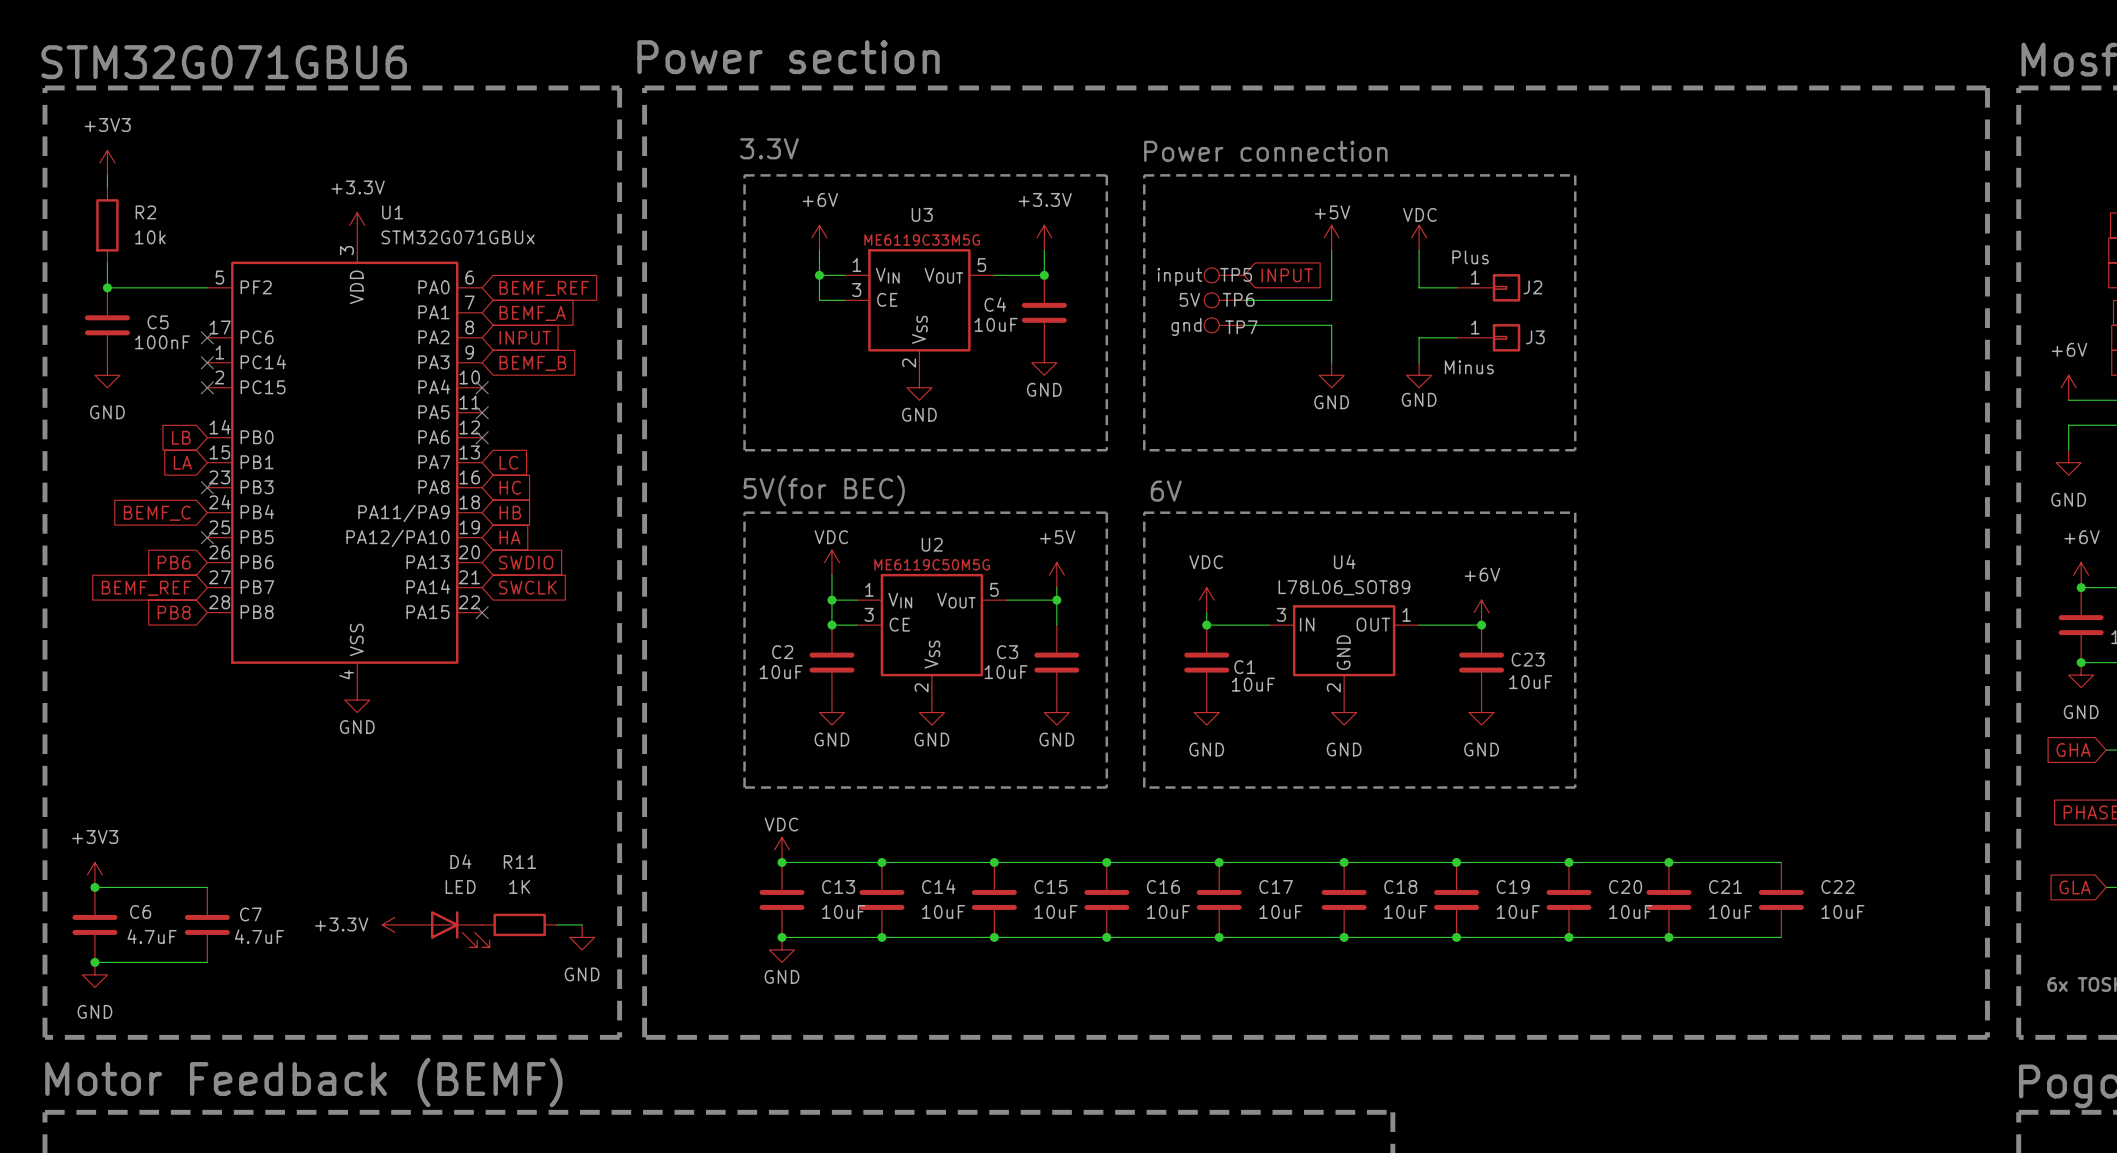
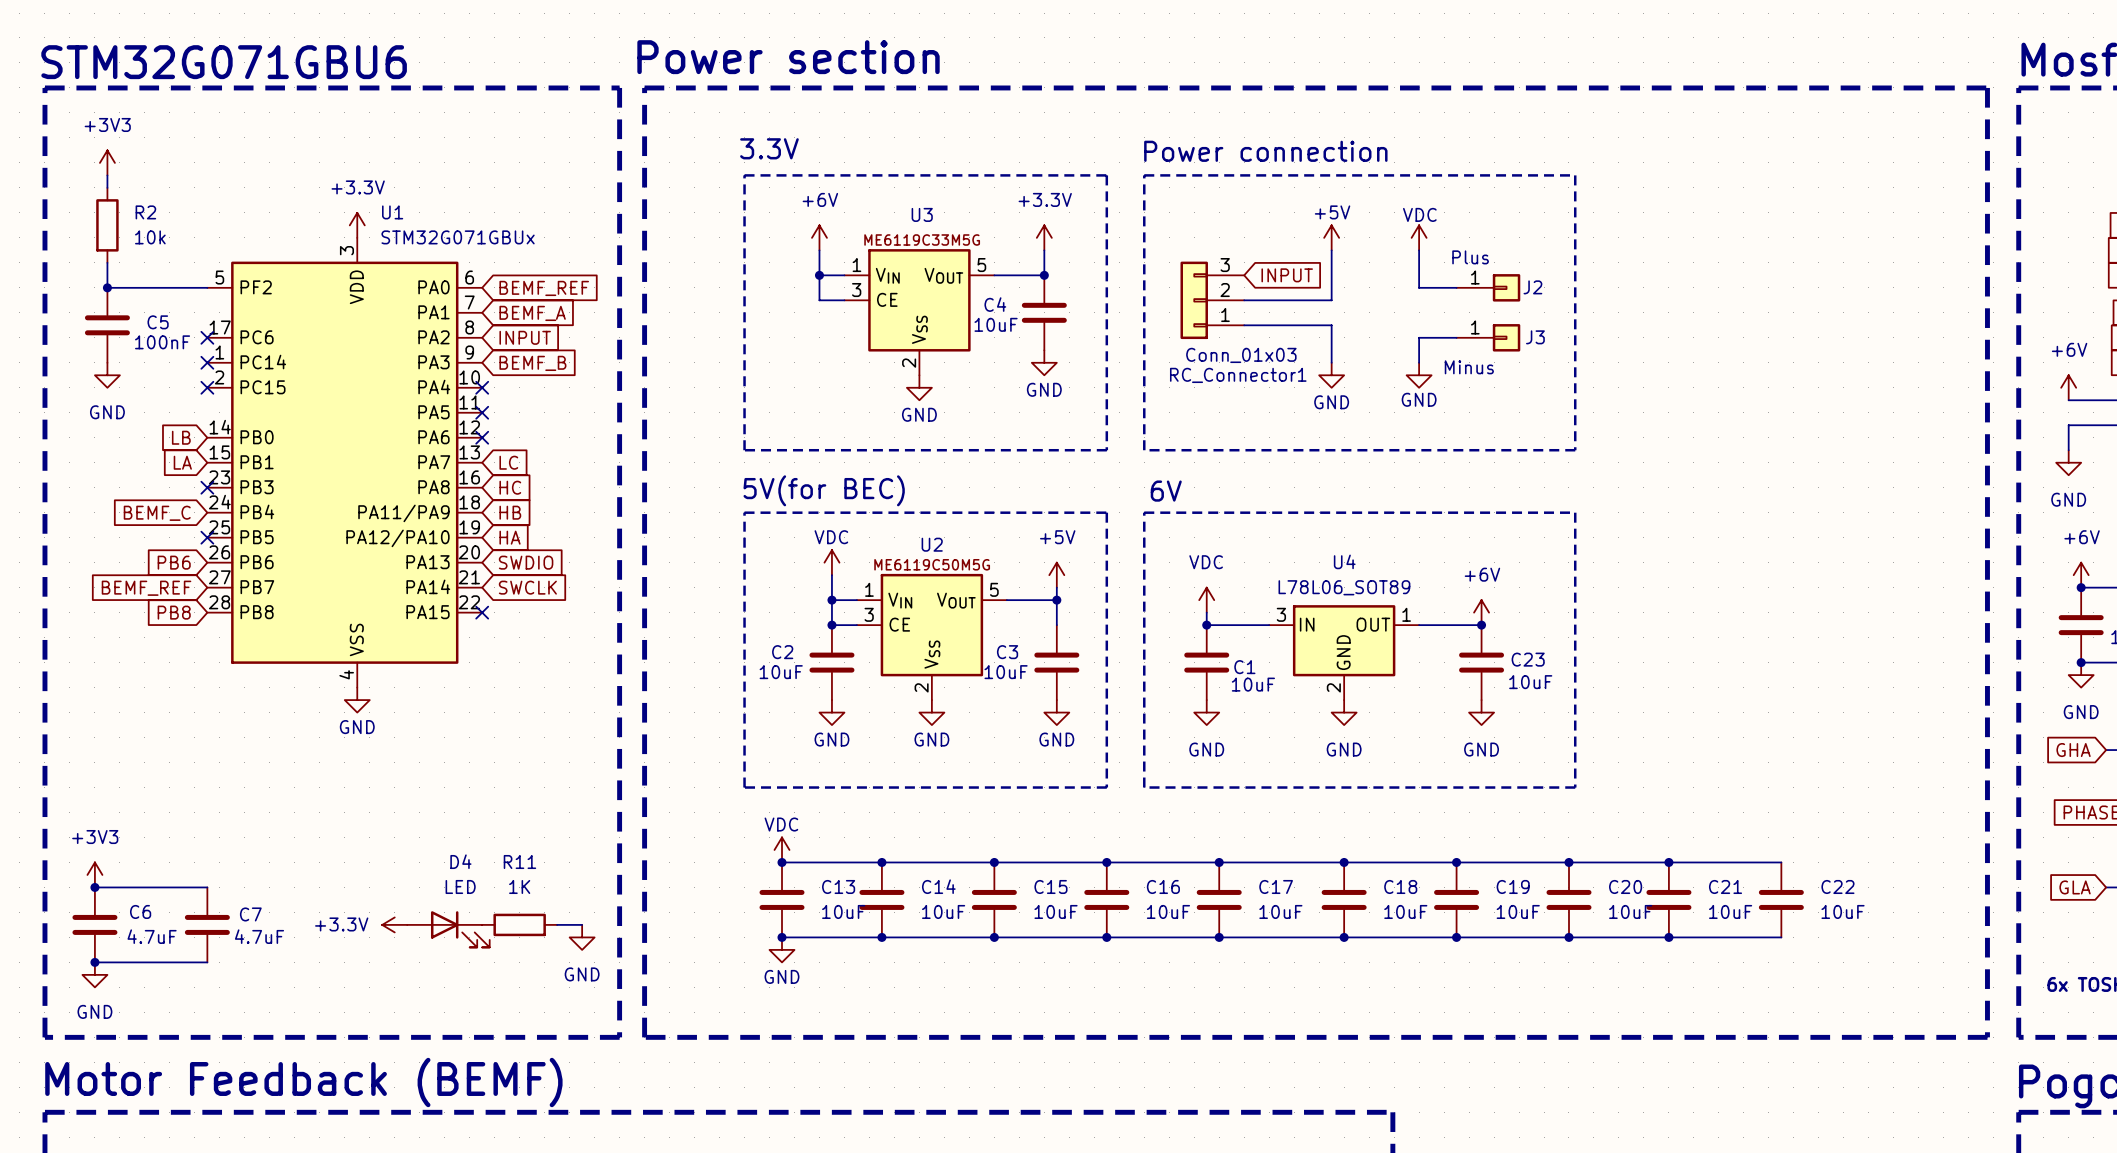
TP5: input (1224, 275) -> none
RC_Connector1: none -> Conn_01x03 (1212, 300)
TP6: 5V (1224, 300) -> none
TP7: gnd (1224, 325) -> none

